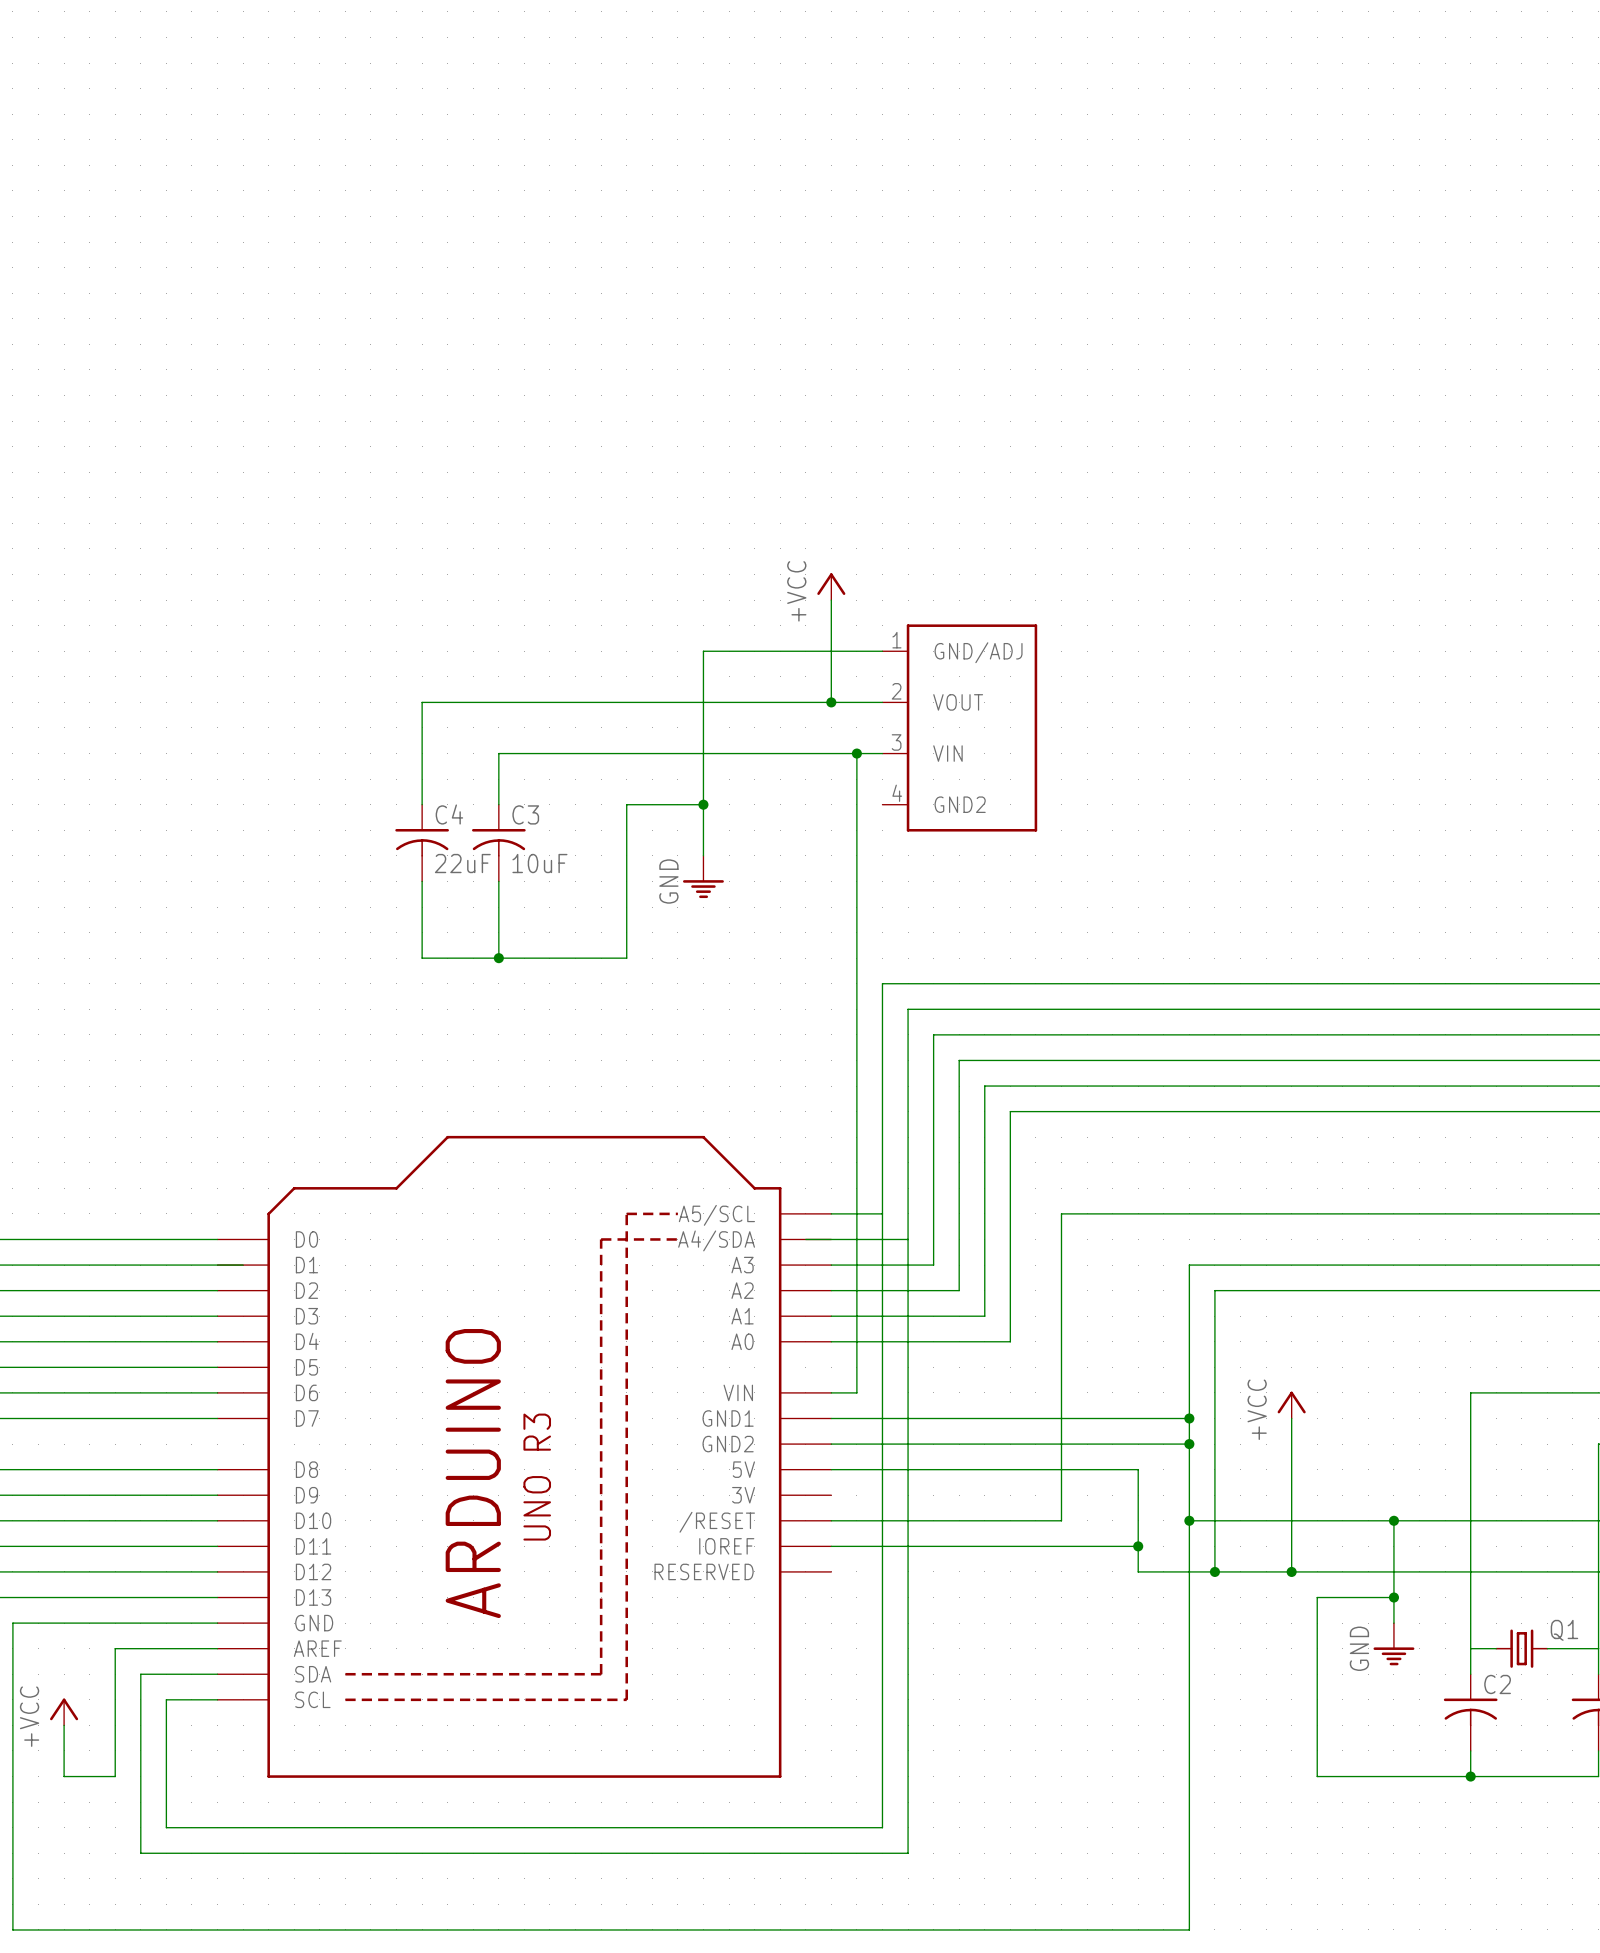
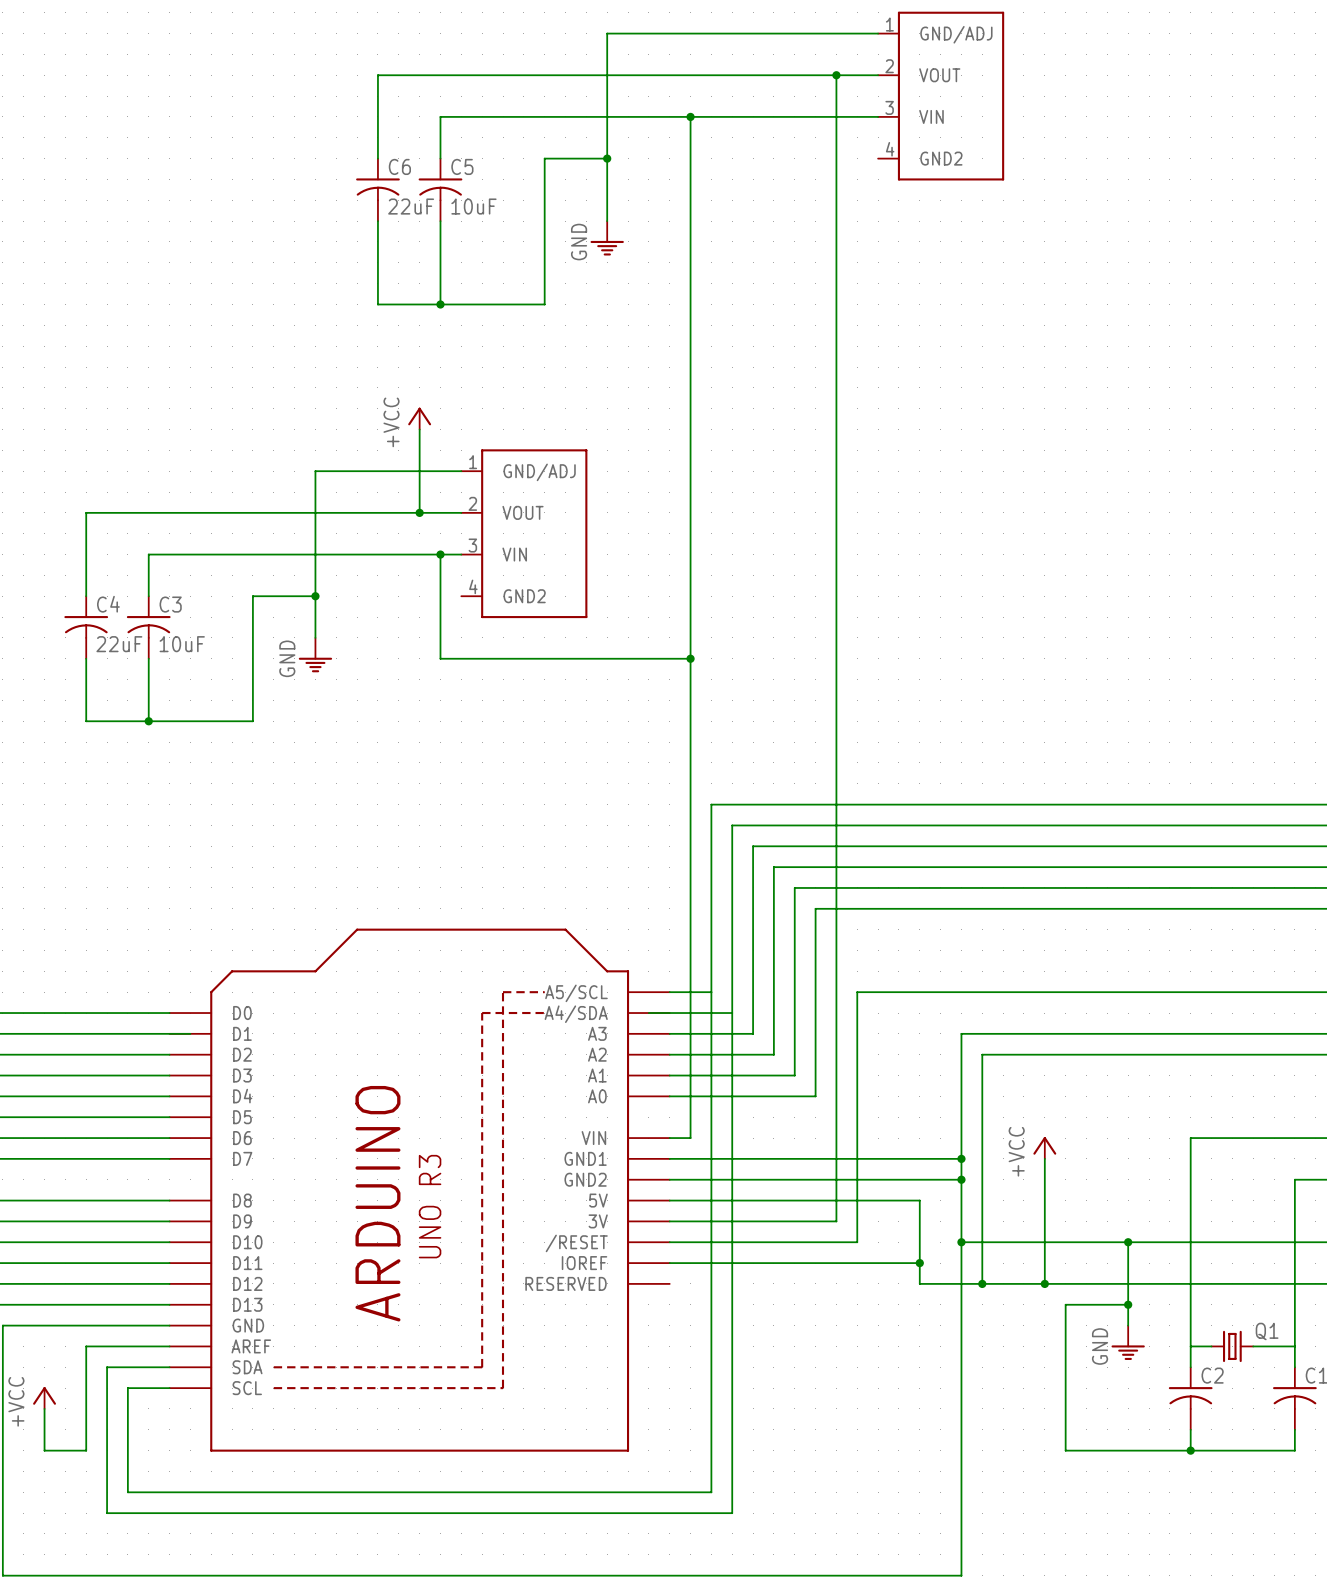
wire: none -> (878, 33) (607, 33) (607, 221)
wire: none -> (836, 75) (836, 1221) (669, 1221)
junction: none -> (836, 75)
wire: none -> (878, 75) (377, 75) (377, 158)
part: none -> (941, 96)
wire: none -> (690, 116) (690, 617)
junction: none -> (690, 116)
wire: none -> (878, 116) (440, 116) (440, 158)
wire: none -> (607, 158) (544, 158) (544, 304) (377, 304) (377, 221)
junction: none -> (607, 158)
C6: none -> 22uF (377, 189)
C5: none -> 10uF (440, 189)
wire: none -> (440, 221) (440, 304)
power symbol: none -> GND (607, 238)
junction: none -> (440, 304)
power symbol: none -> +VCC (419, 418)
wire: none -> (419, 429) (419, 512)
wire: none -> (461, 471) (315, 471) (315, 637)
power symbol: +VCC (831, 586) -> none
wire: (831, 600) (831, 702) -> none
junction: none -> (419, 512)
wire: none -> (461, 512) (86, 512) (86, 596)
part: none -> (524, 533)
wire: (882, 651) (703, 651) (703, 855) -> none
junction: none -> (440, 554)
wire: none -> (461, 554) (148, 554) (148, 596)
junction: (831, 702) -> none
wire: (882, 702) (422, 702) (422, 804) -> none
wire: none -> (315, 596) (252, 596) (252, 721) (86, 721) (86, 658)
junction: none -> (315, 596)
part: (959, 727) -> none
junction position: (856, 753) -> (690, 658)
wire: (882, 753) (498, 753) (498, 804) -> none
power symbol: none -> GND (315, 655)
wire: none -> (148, 658) (148, 721)
wire: (626, 804) (626, 958) (422, 958) (422, 881) -> (503, 658) (440, 658) (440, 554)
wire: none -> (565, 658) (690, 658)
junction: (703, 804) -> none
C4 position: (422, 843) -> (86, 627)
C3 position: (498, 843) -> (148, 627)
power symbol: GND (703, 876) -> none
junction: none -> (148, 721)
wire: (498, 881) (498, 958) -> none
junction: (498, 958) -> none

